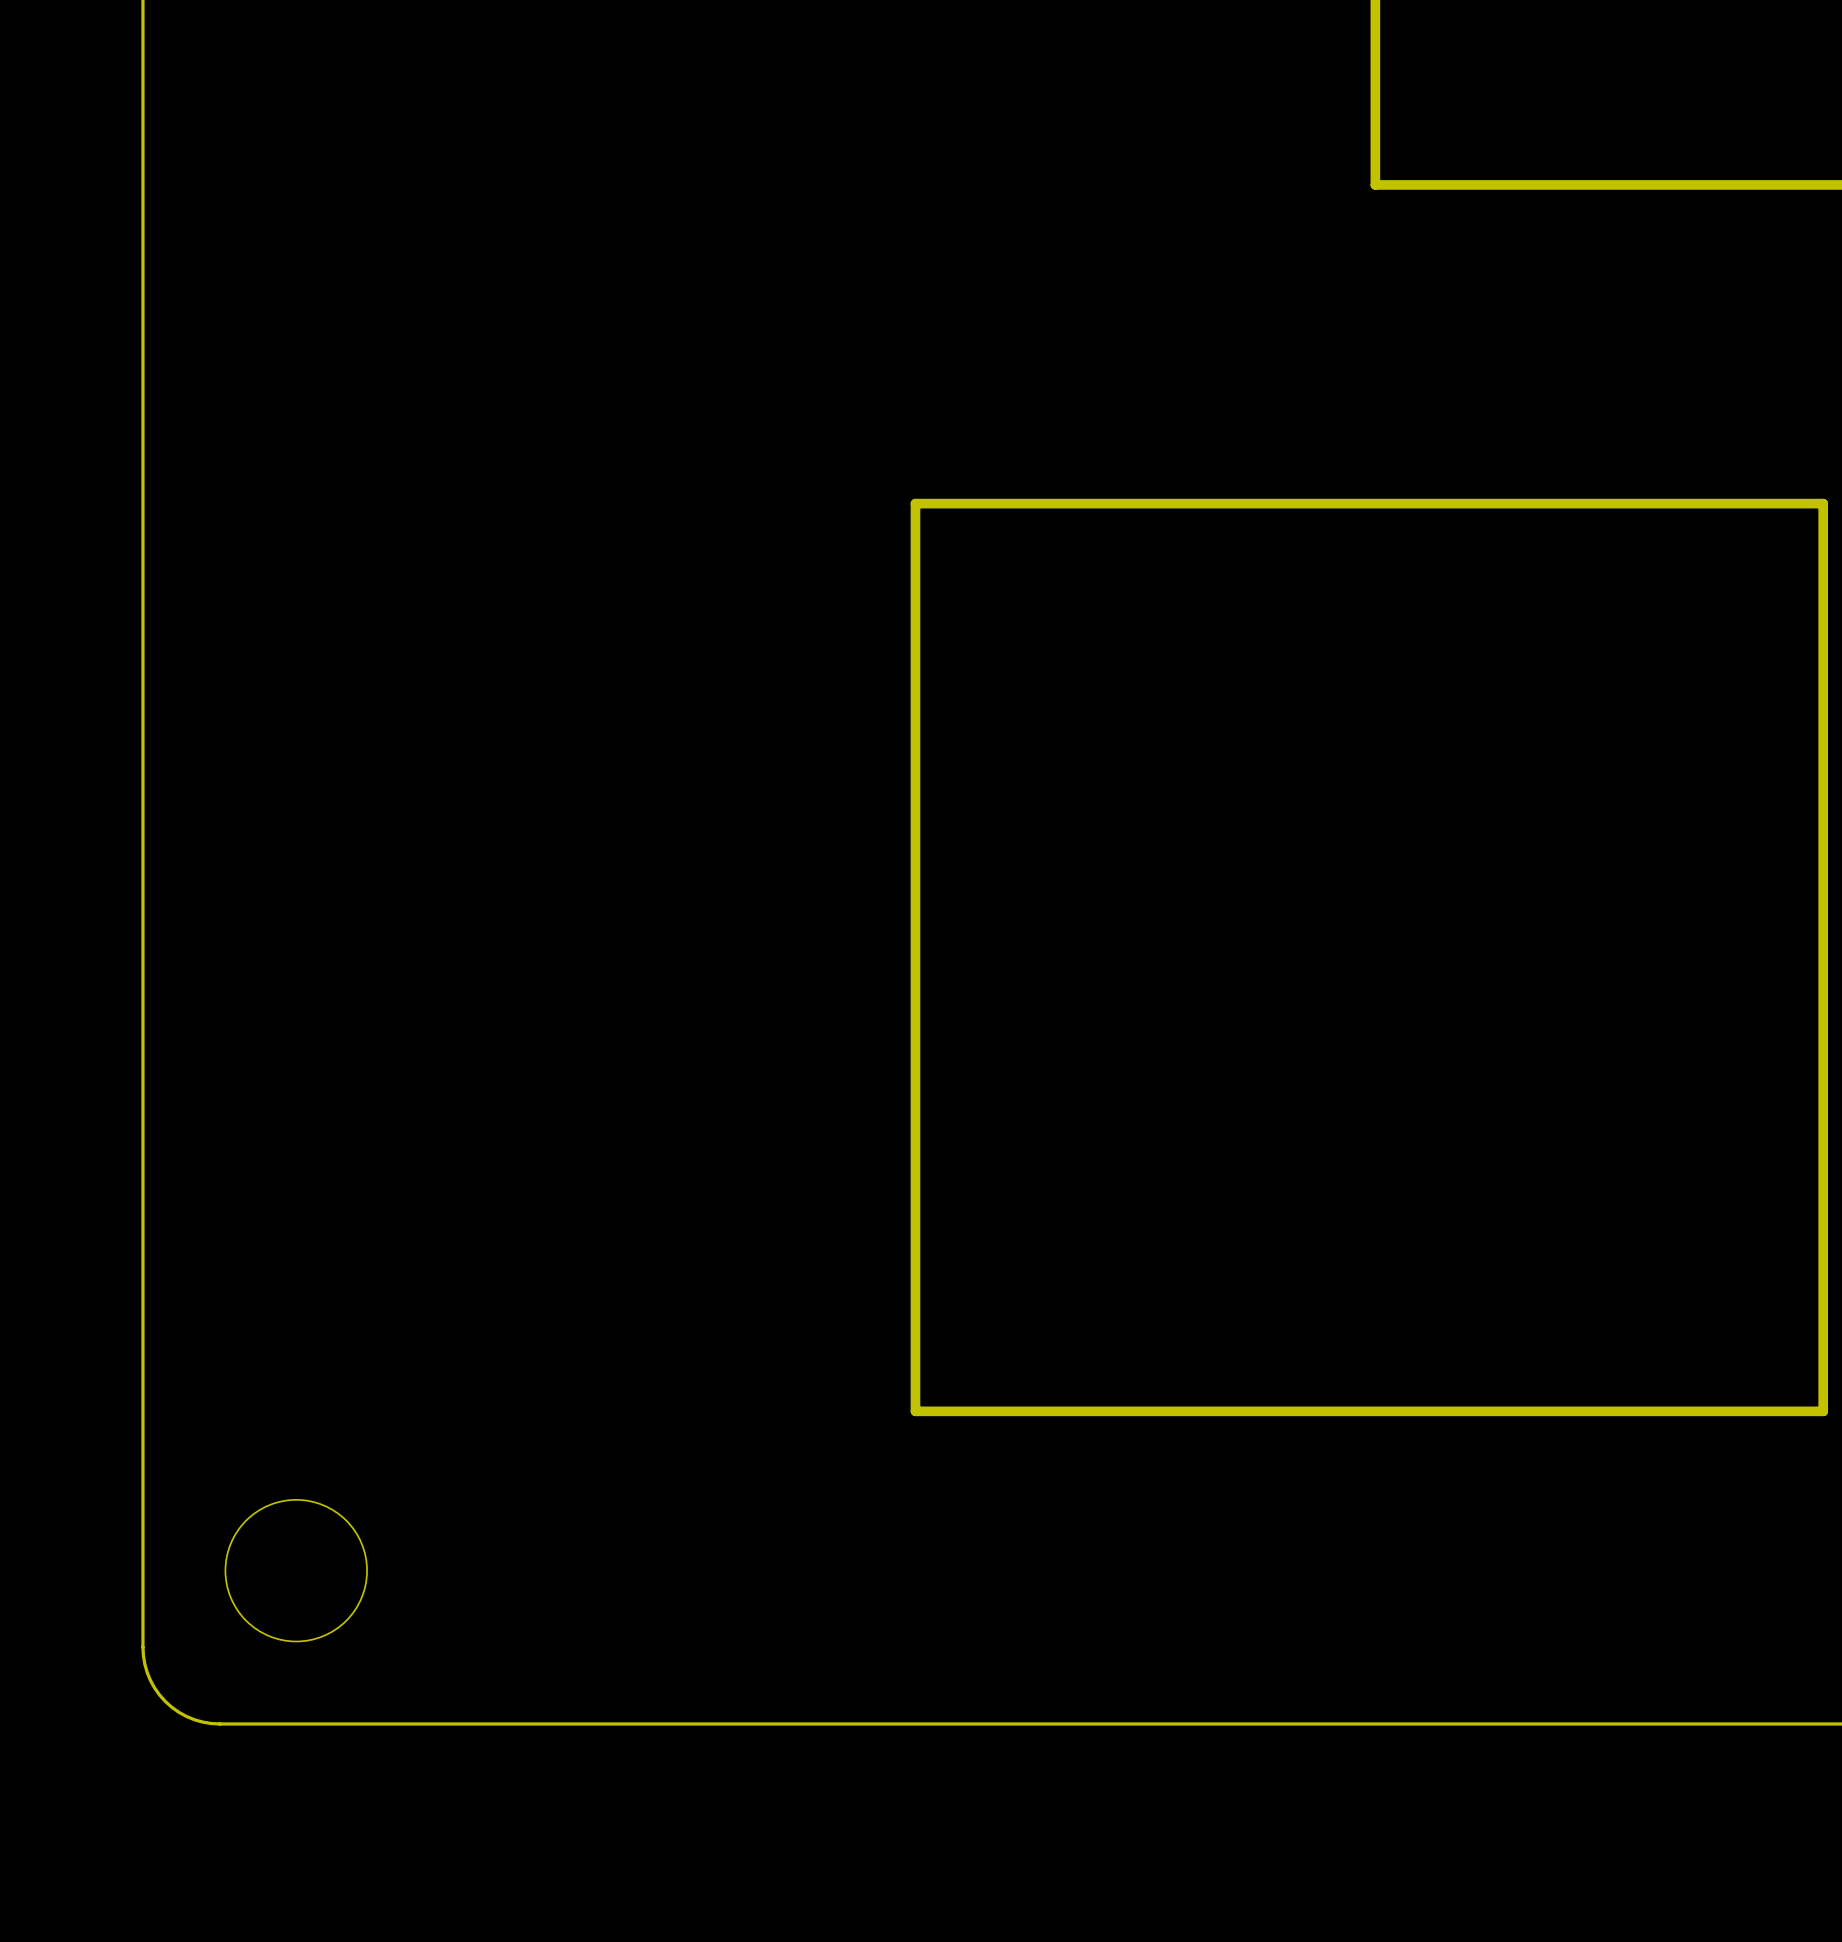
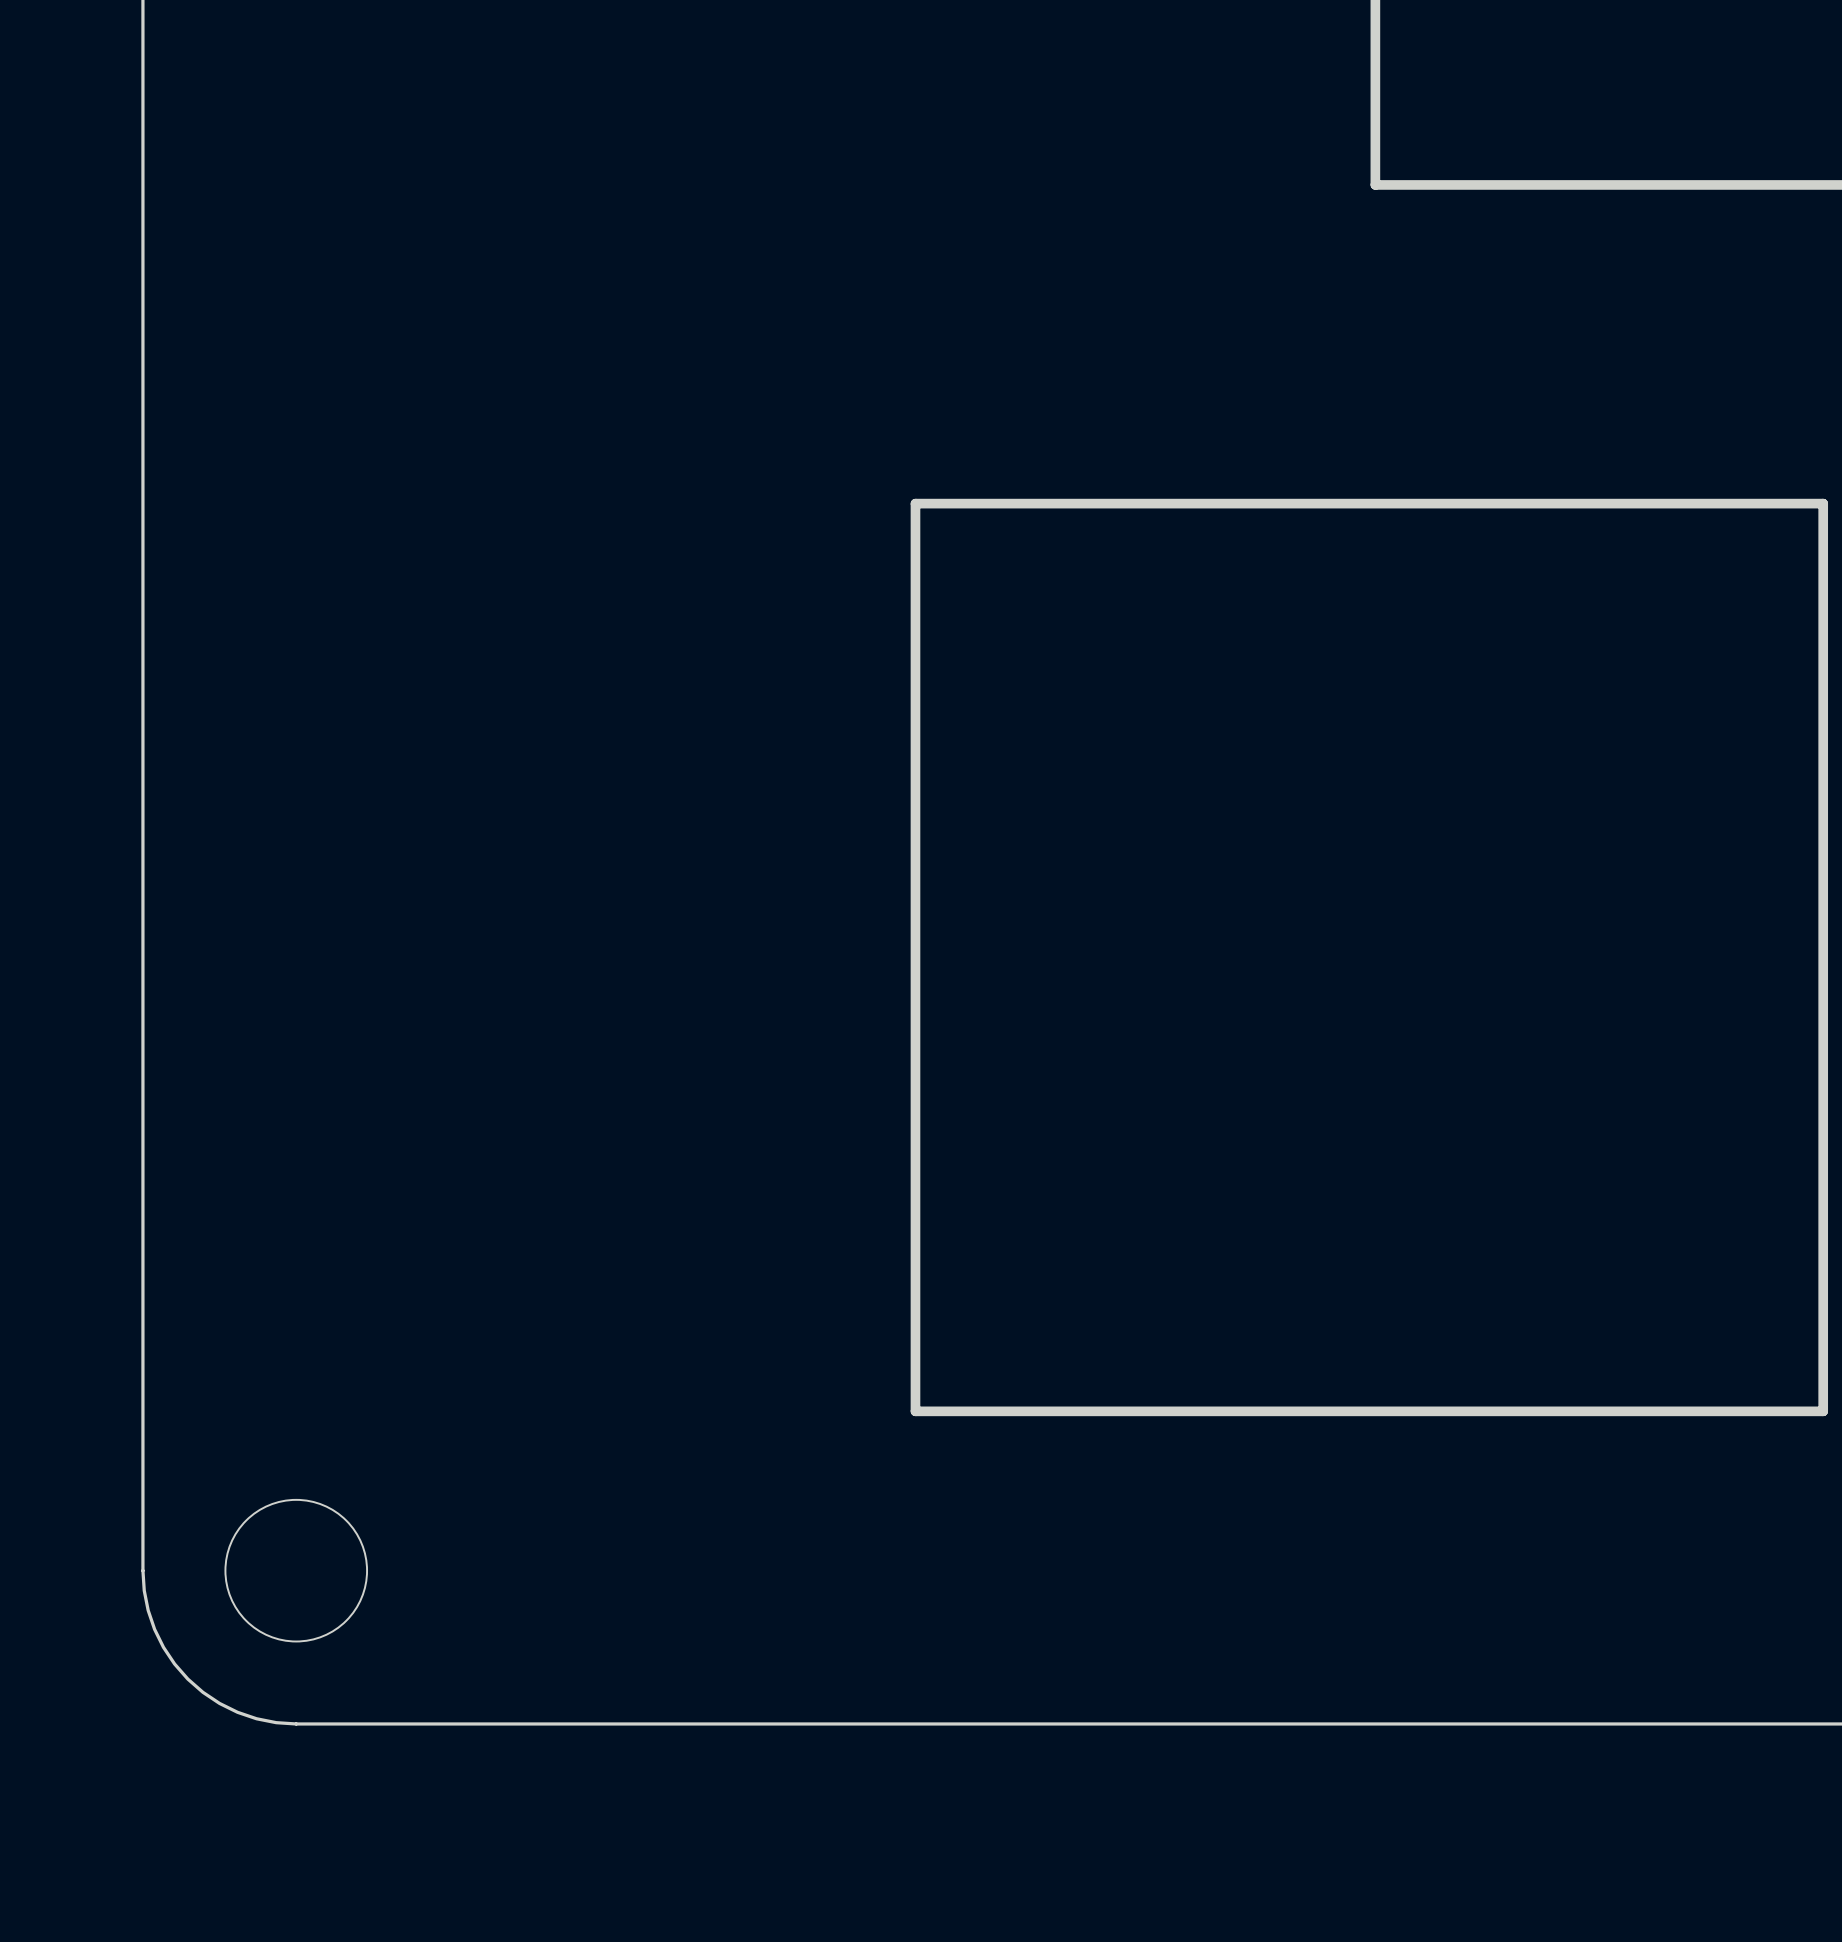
board edge: (142, 1570) (142, 1647) (144, 1664) (154, 1688) (165, 1701) (186, 1716) (202, 1722) (219, 1723) (296, 1723) -> (142, 1570) (144, 1590) (154, 1629) (174, 1664) (187, 1679) (202, 1692) (237, 1712) (276, 1722) (296, 1723)

